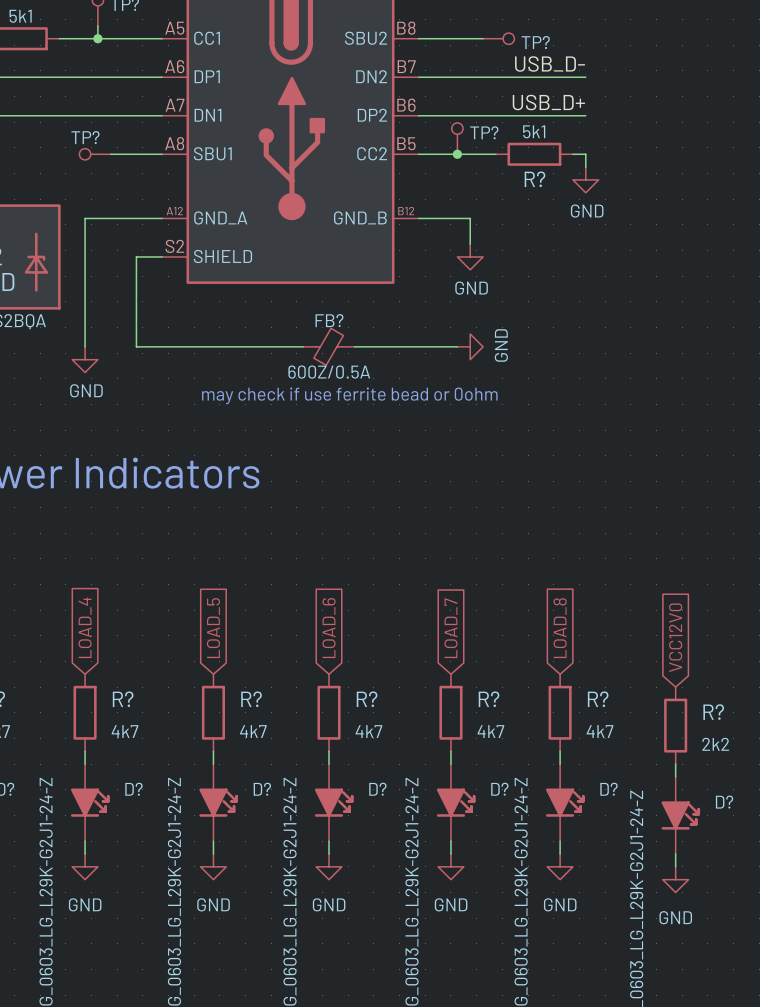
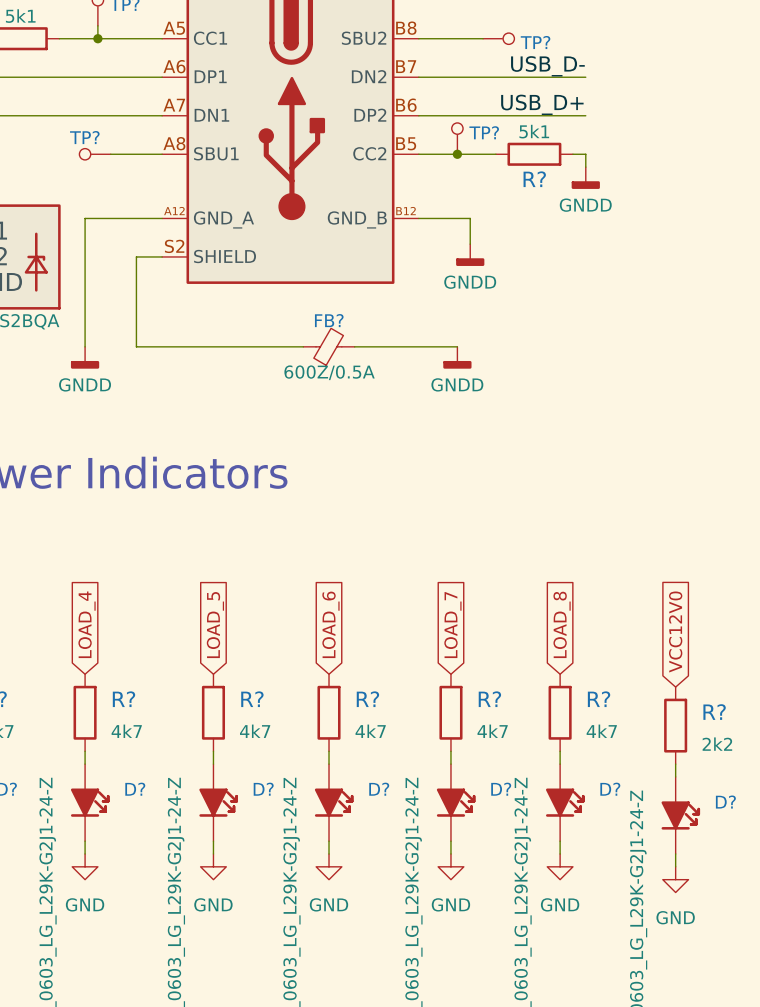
power symbol: GND (585, 179) -> GNDD (585, 178)
power symbol: GND (470, 256) -> GNDD (470, 255)
power symbol: GND (470, 346) -> none
power symbol: none -> GNDD (457, 357)
power symbol: GND (85, 359) -> GNDD (85, 357)
text: may check if use ferrite bead or 0ohm (349, 395) -> none

